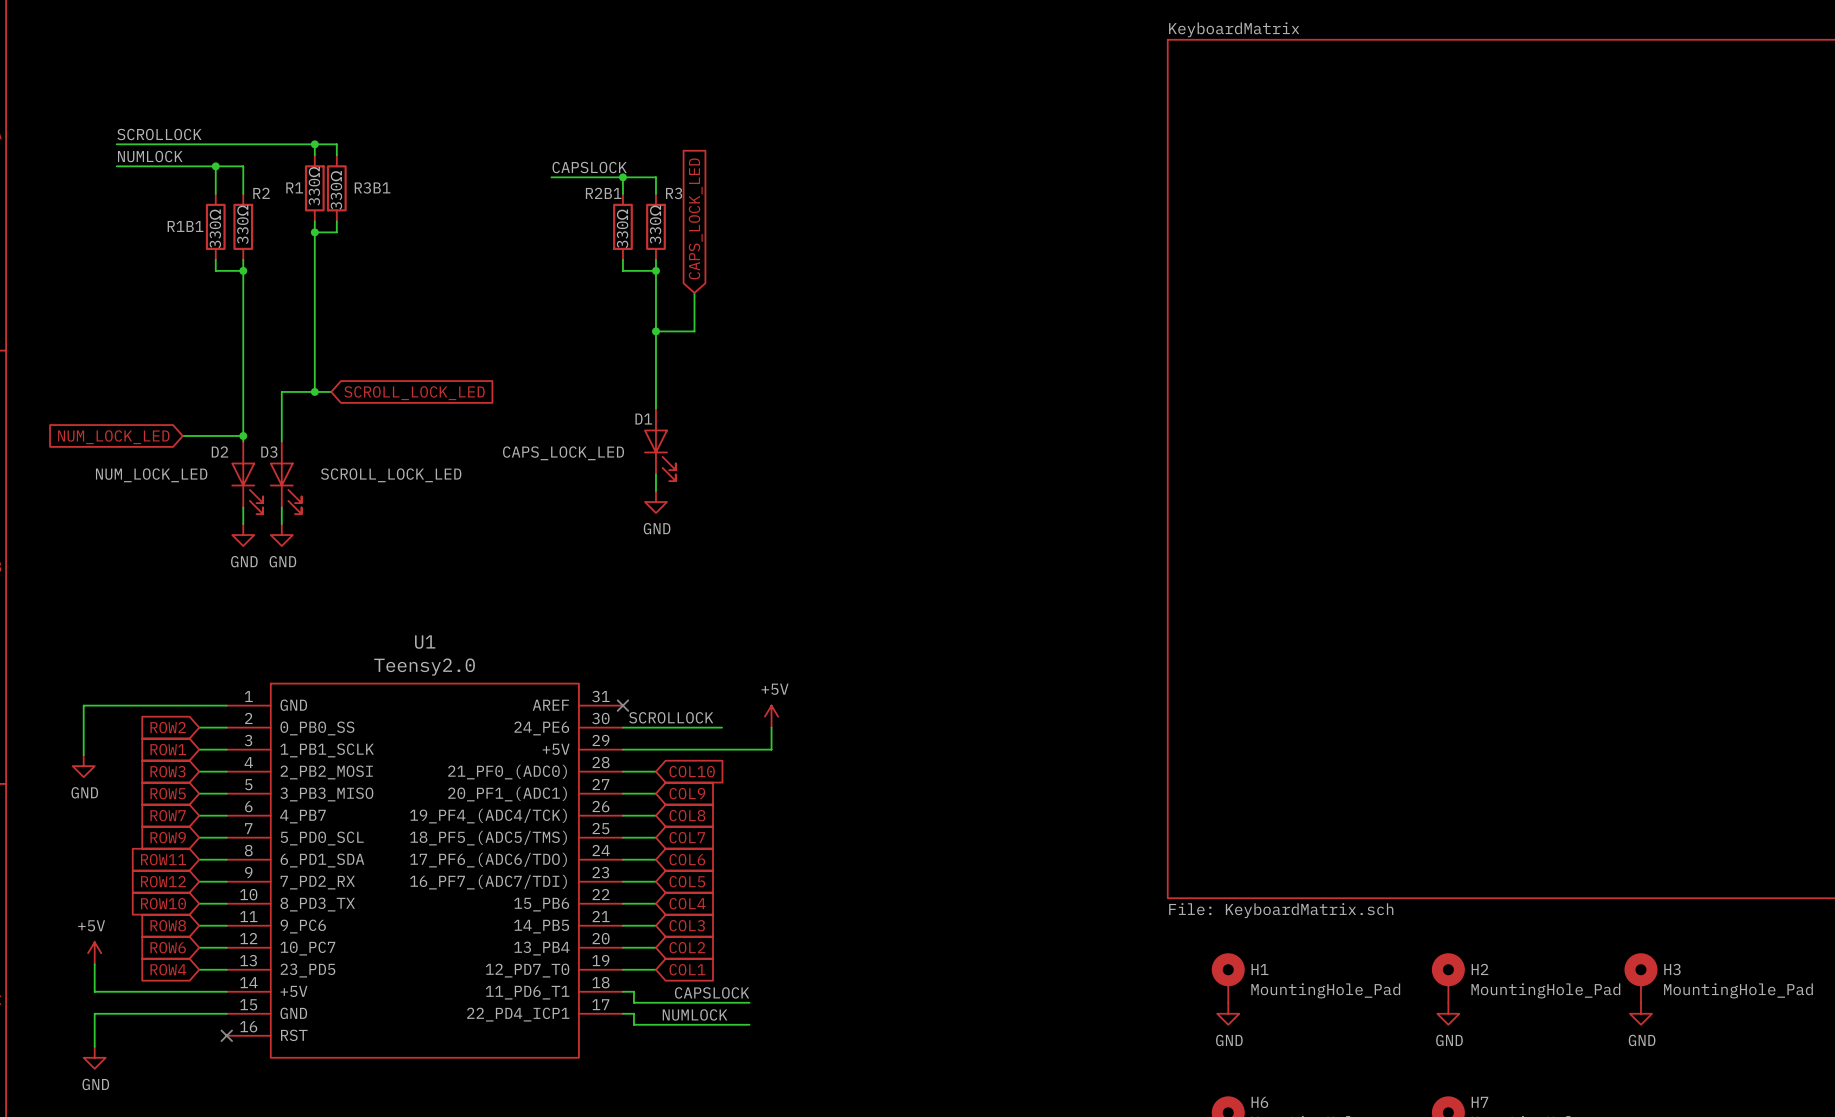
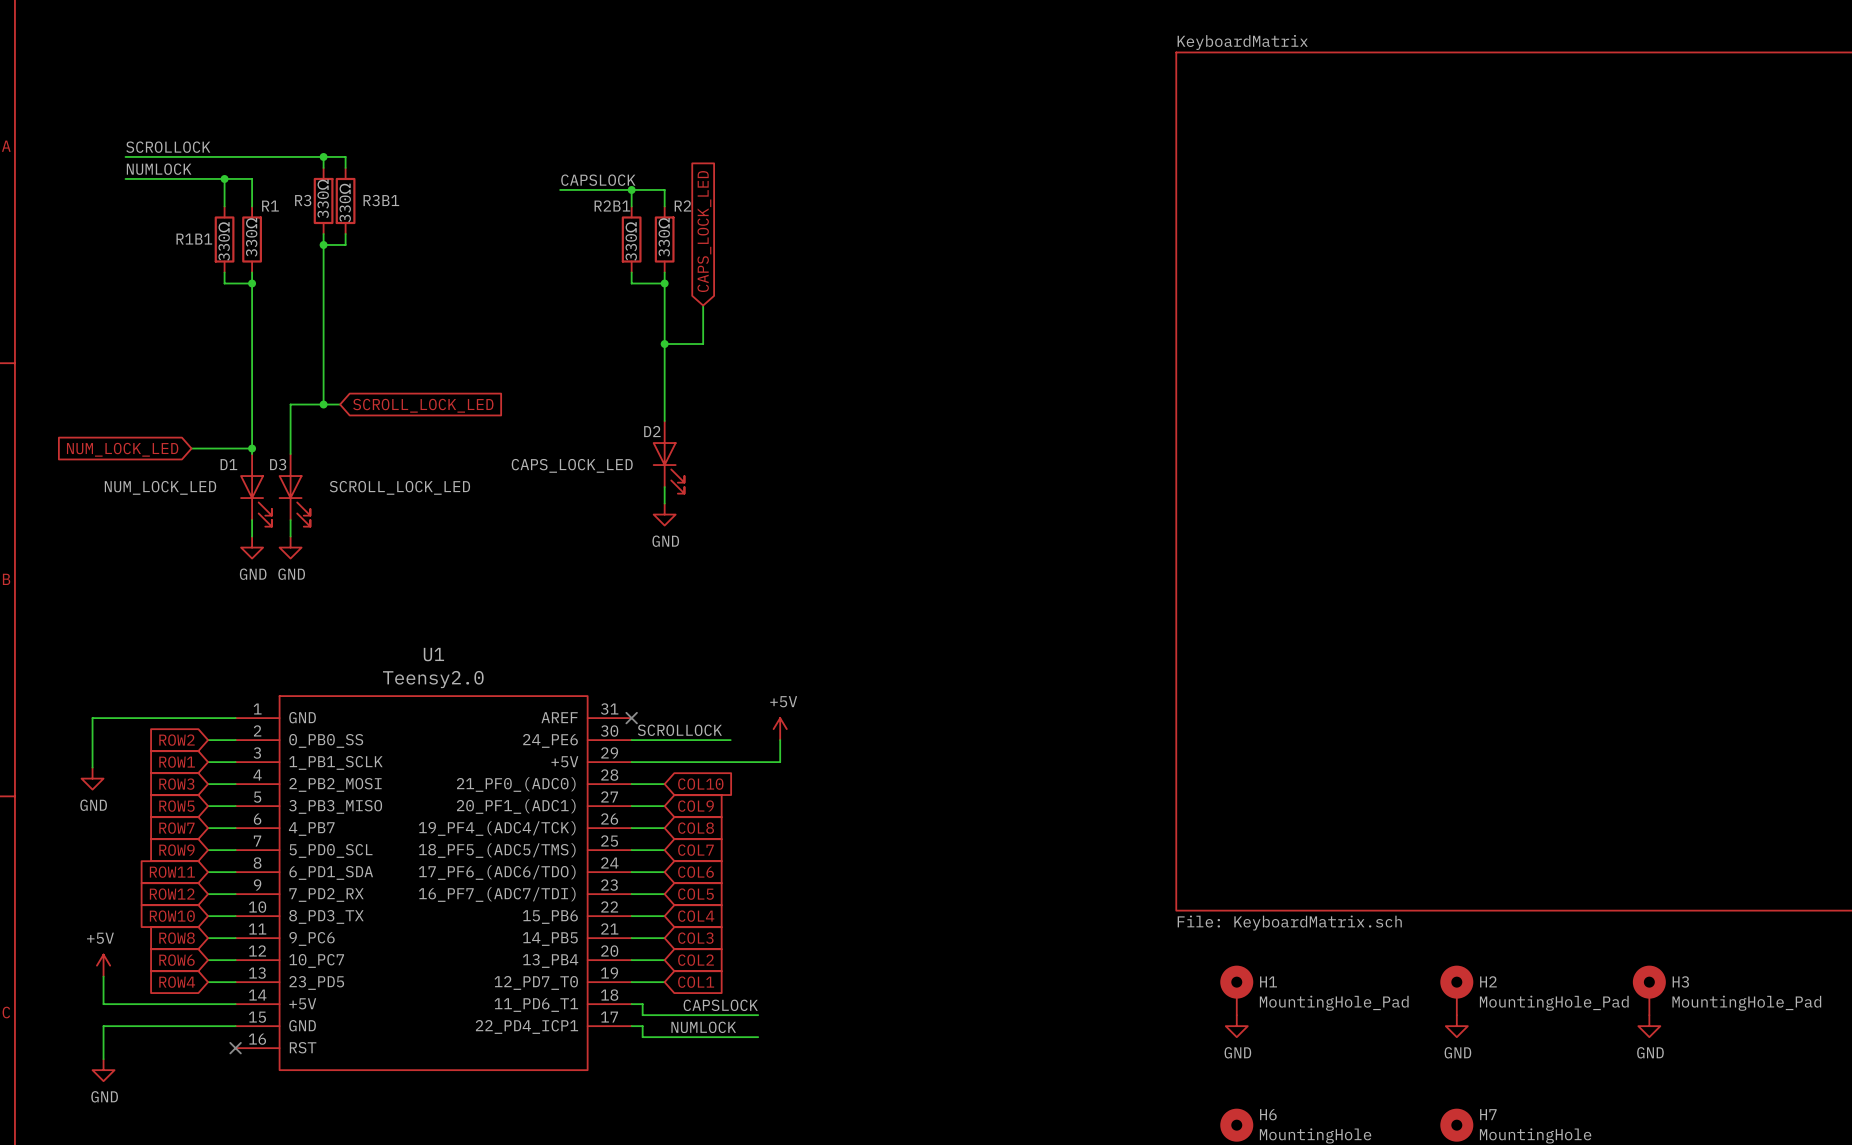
R1 name: R1 (294, 187) -> R3 (303, 200)
R2 name: R2 (261, 193) -> R1 (270, 206)
R3 name: R3 (674, 193) -> R2 (682, 205)
D1 name: D1 (643, 419) -> D2 (652, 431)
D2 name: D2 (219, 451) -> D1 (228, 464)

